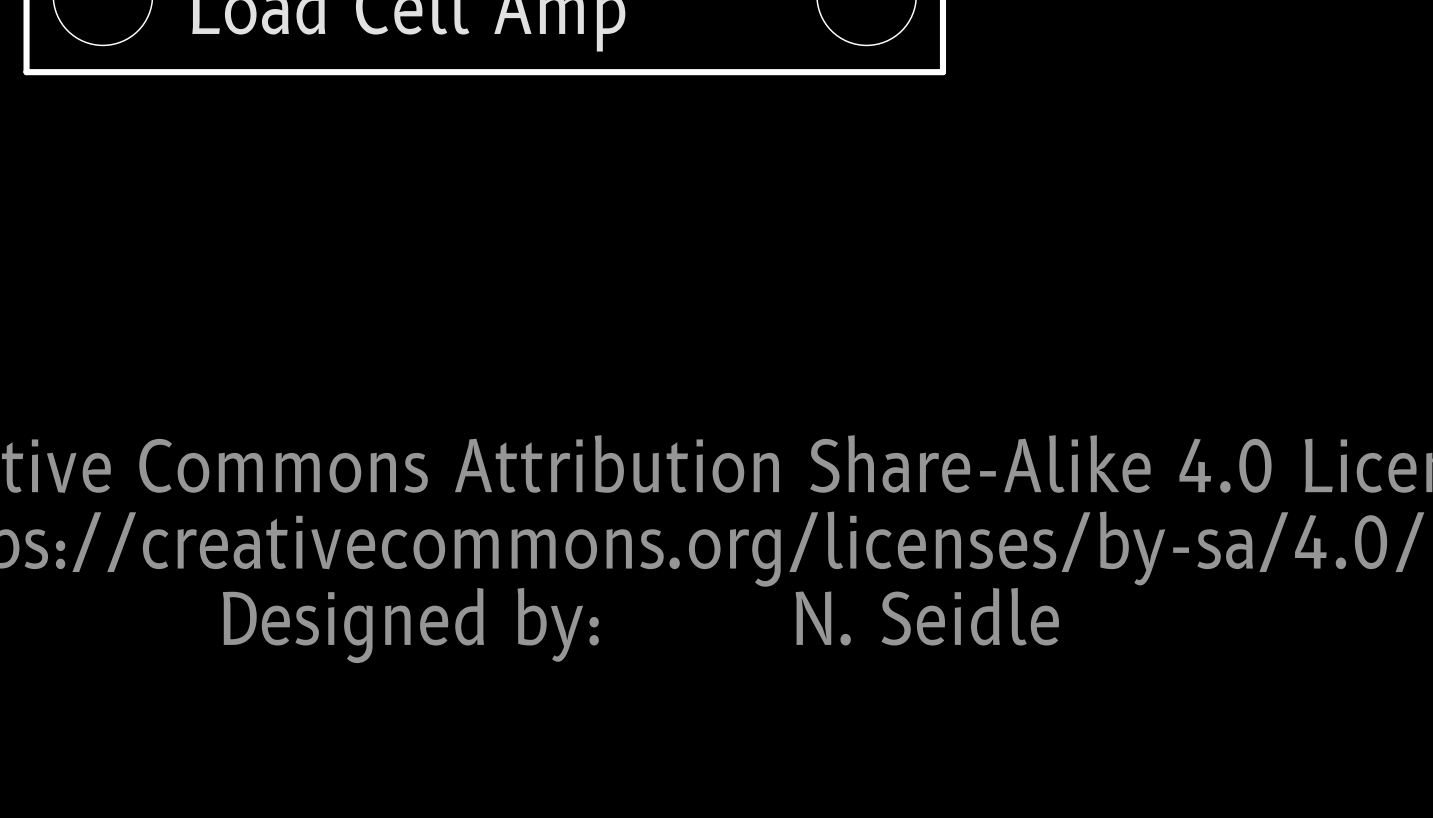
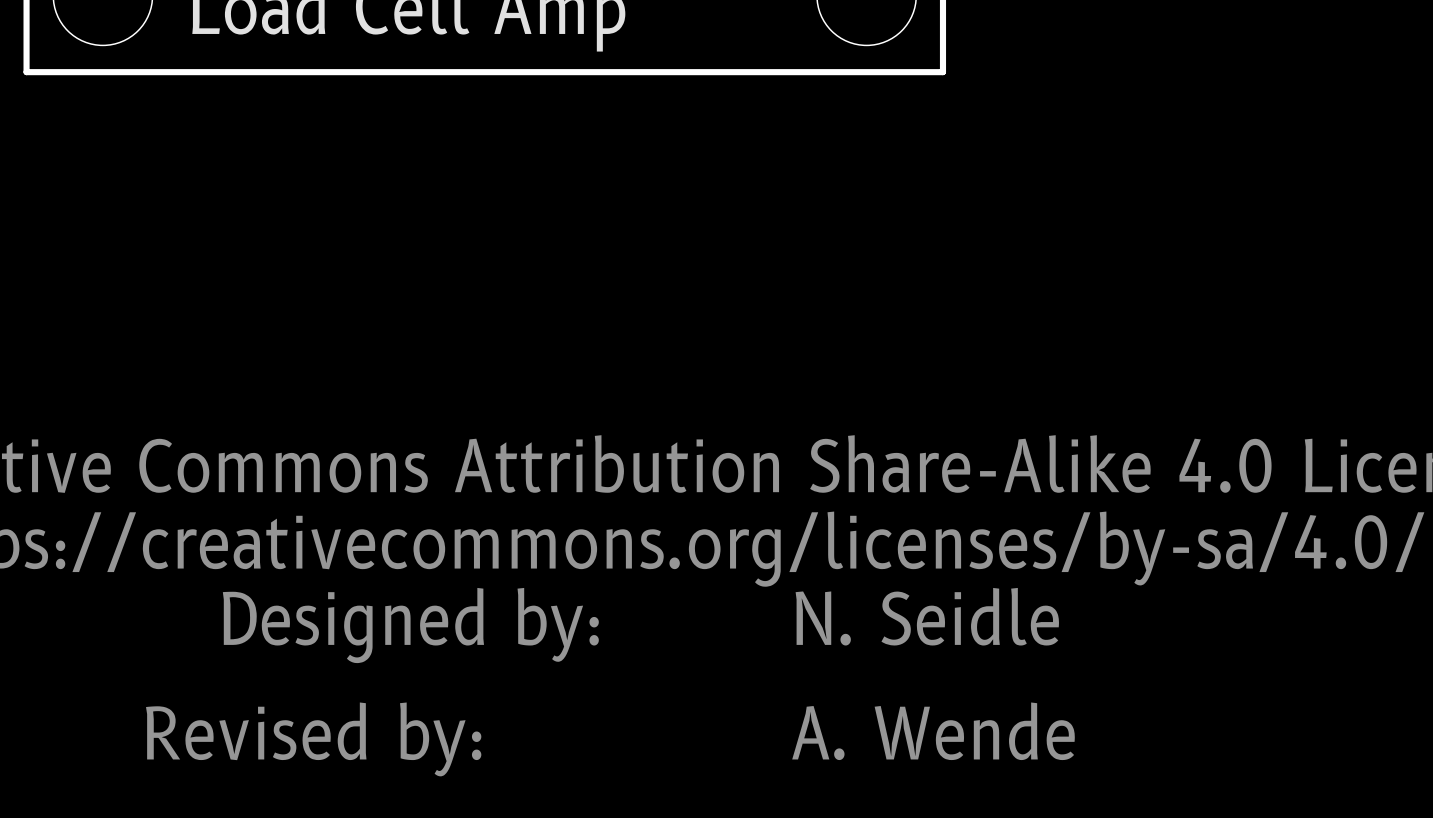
text: none -> A. Wende (933, 731)
text: none -> Revised by: (313, 739)

